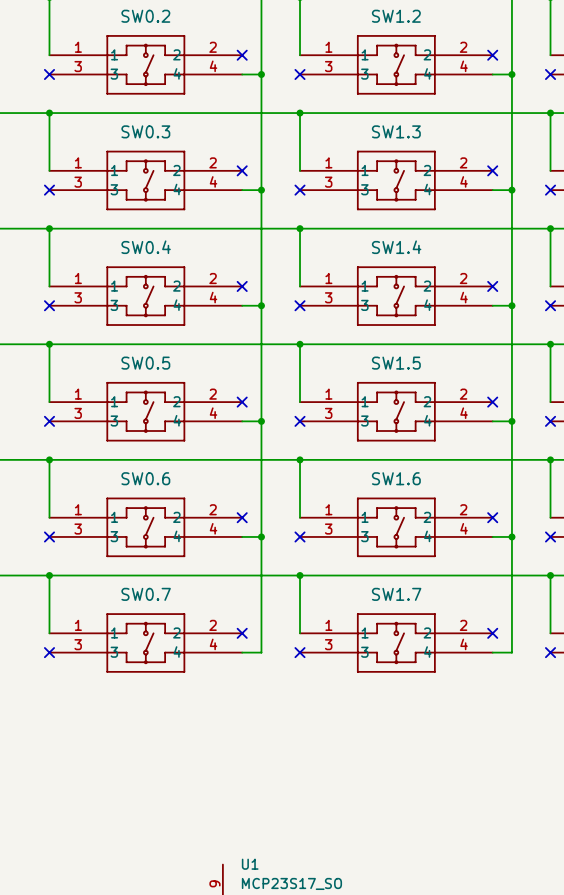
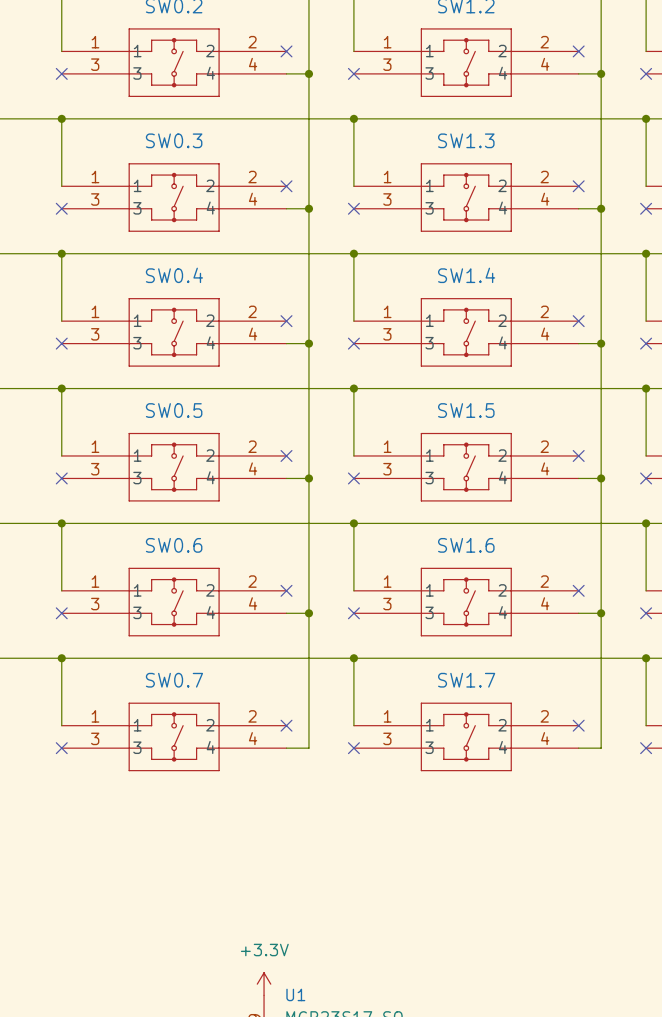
power symbol: none -> +3.3V (264, 984)

